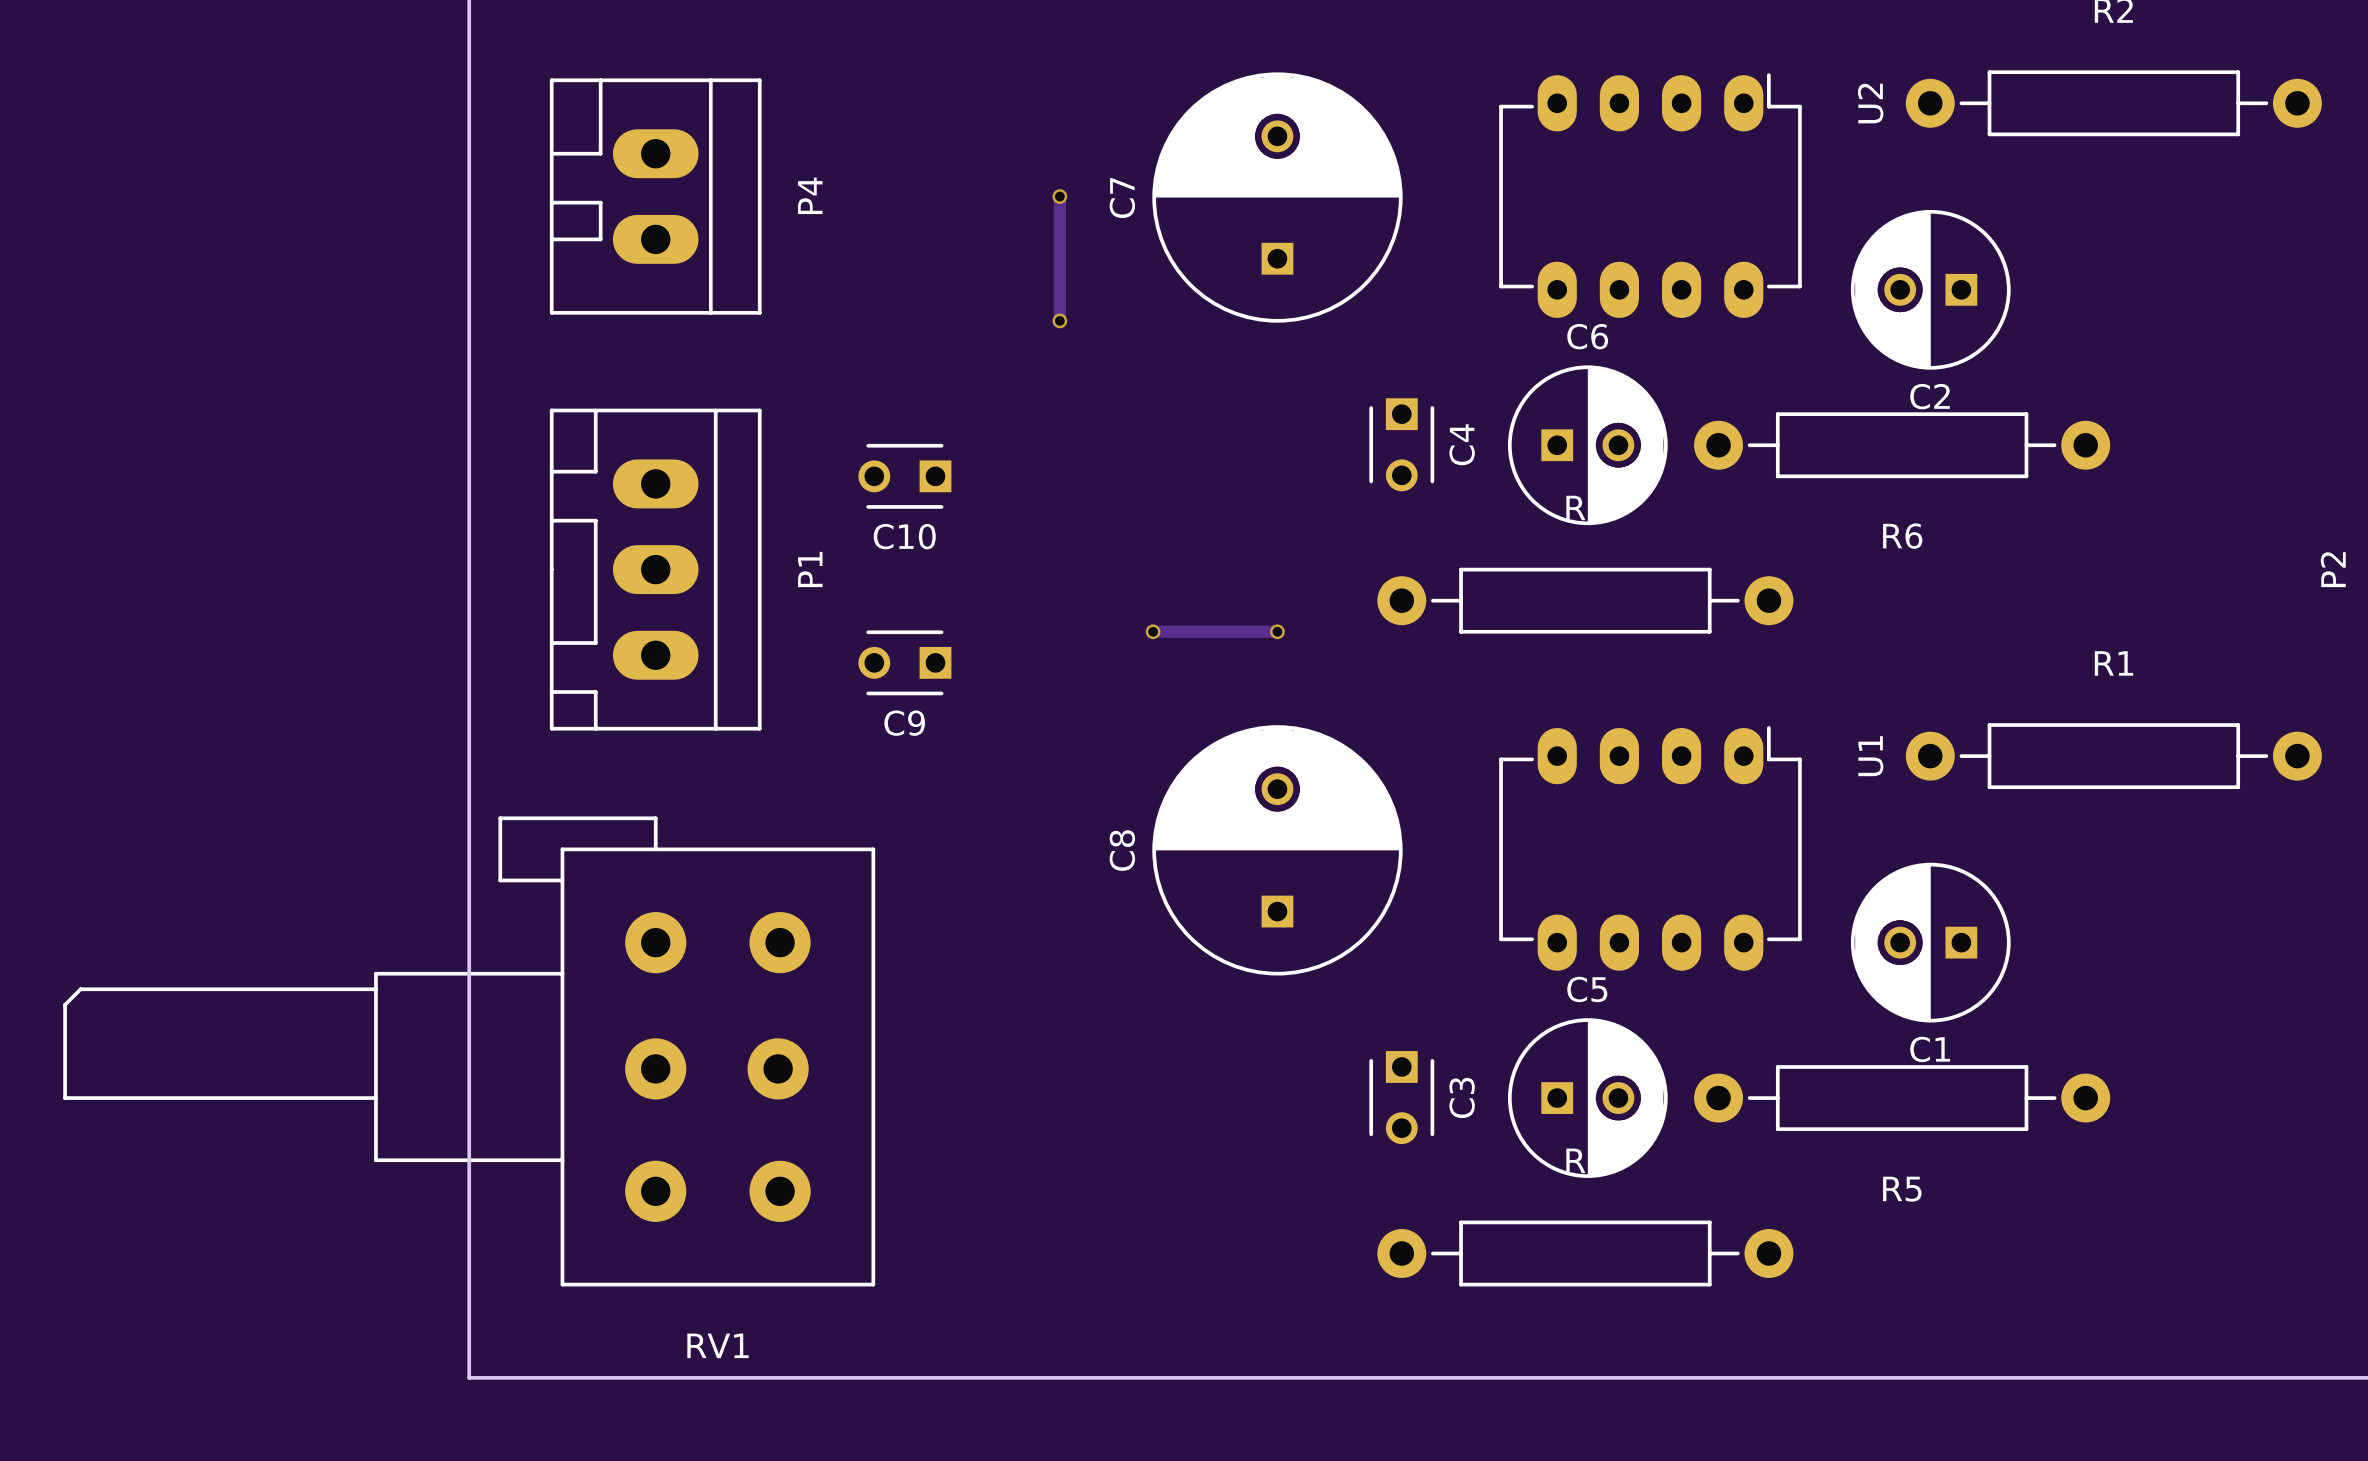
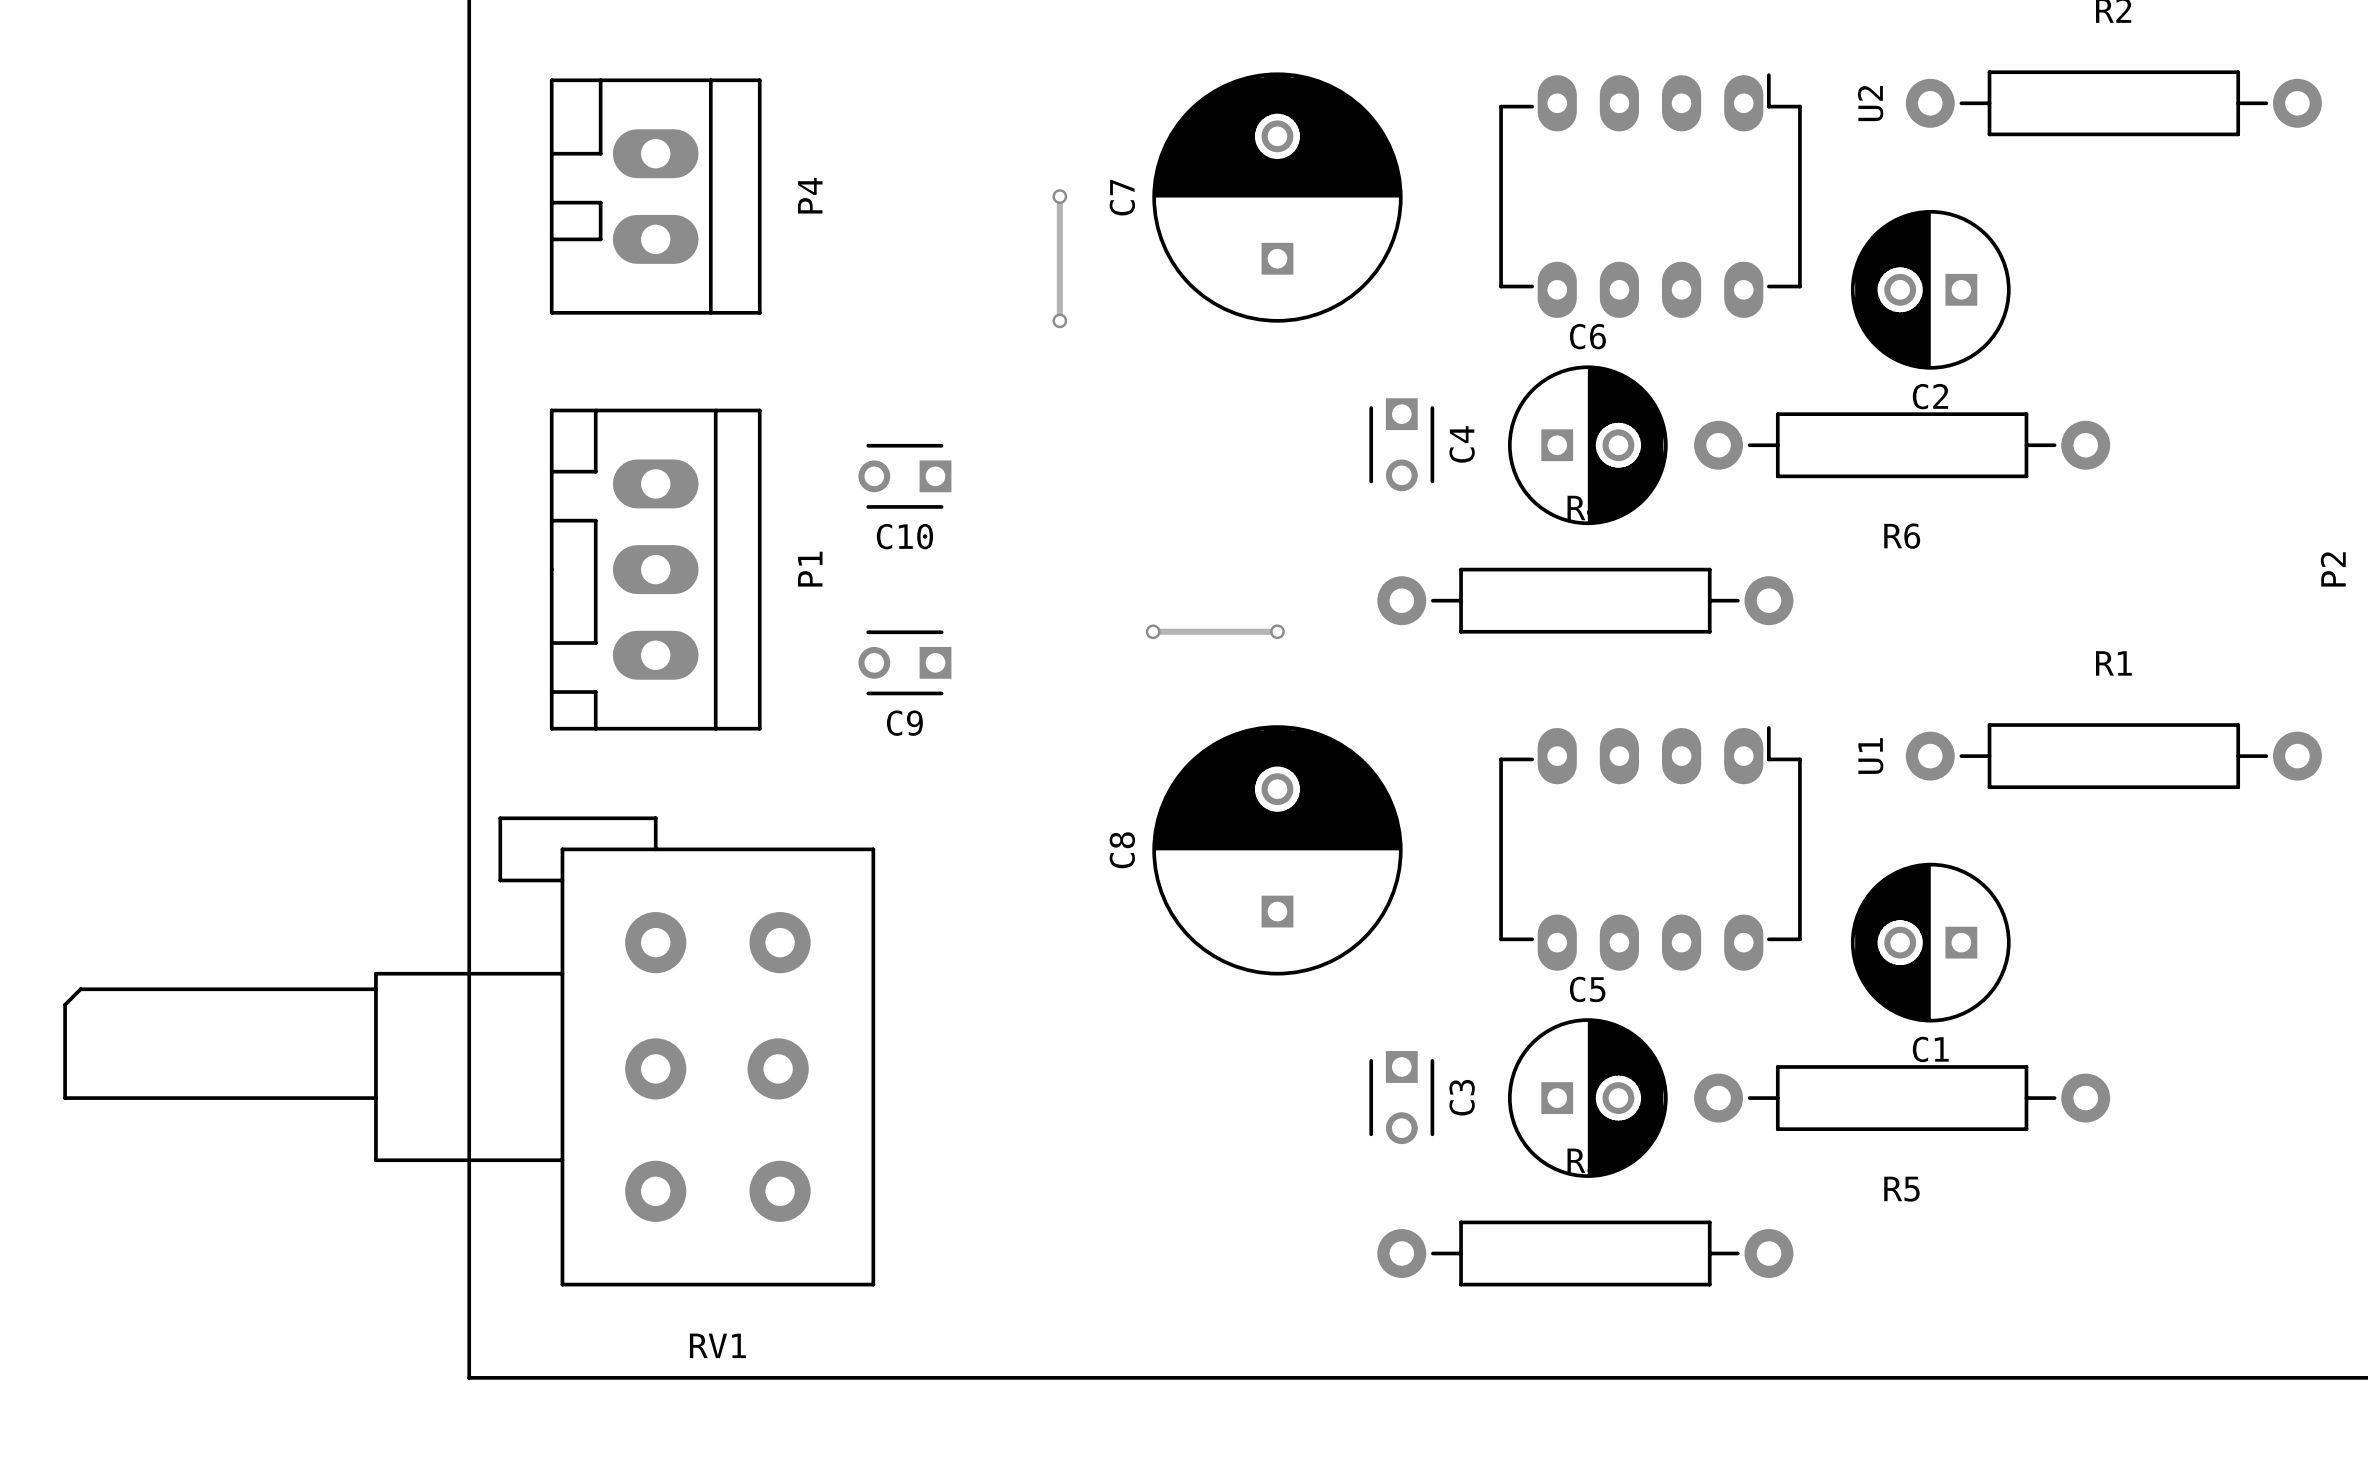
track width: thick (1059, 196) (1059, 320) -> thin (1059, 196) (1059, 320)
track width: thick (1153, 631) (1277, 631) -> thin (1153, 631) (1277, 631)

